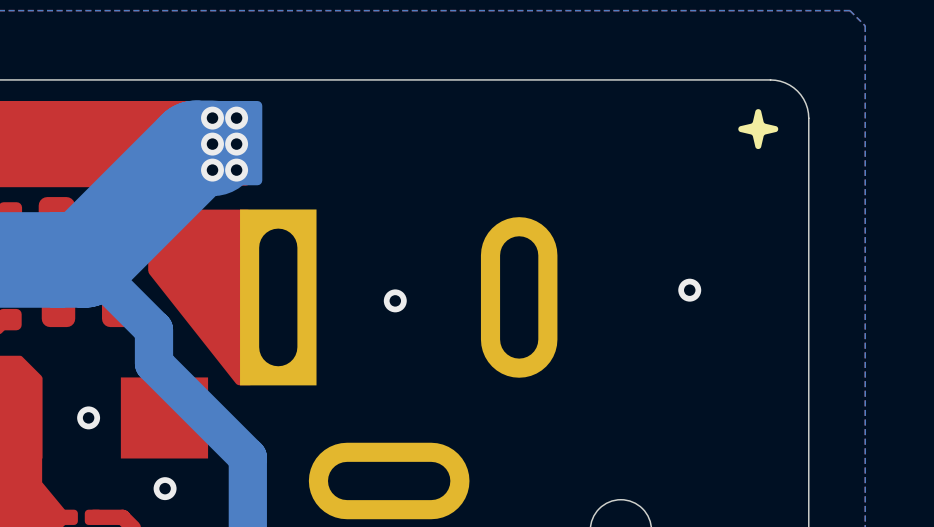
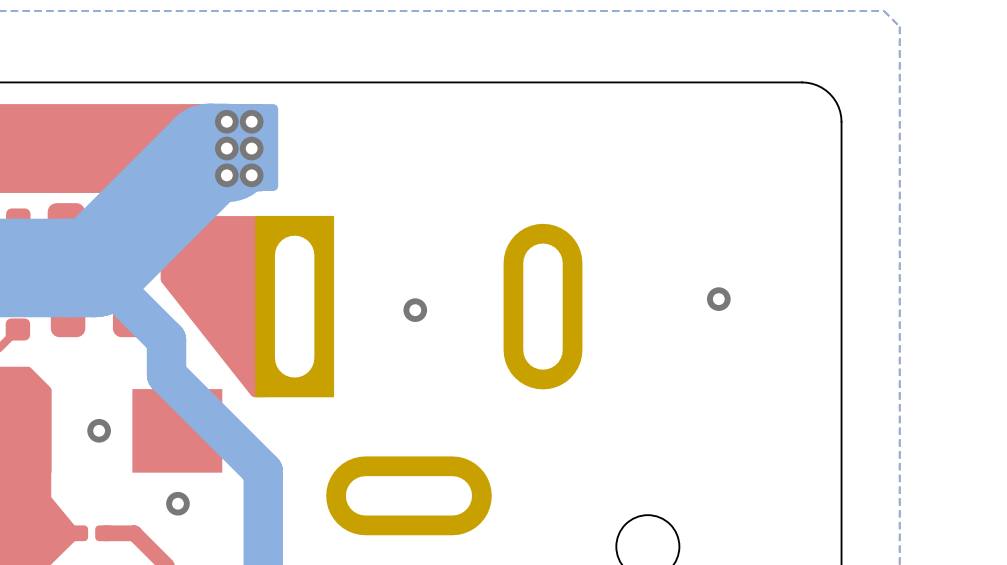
drawing: [738, 109, 779, 150] -> none

